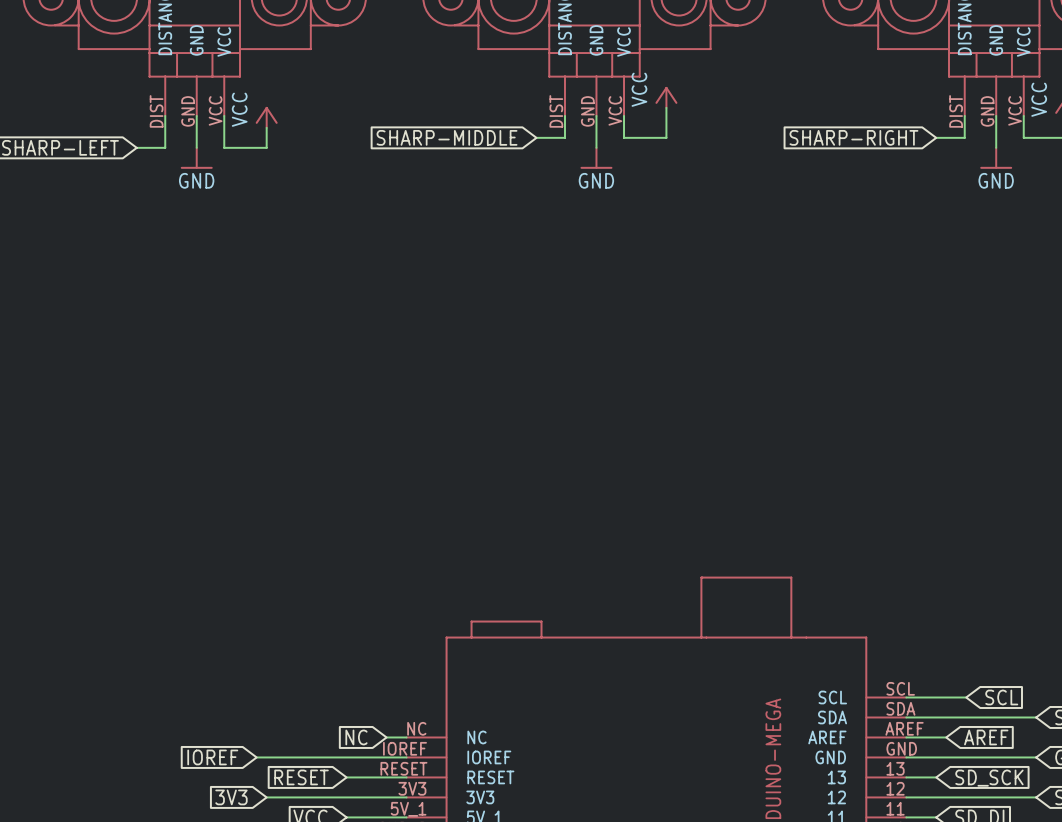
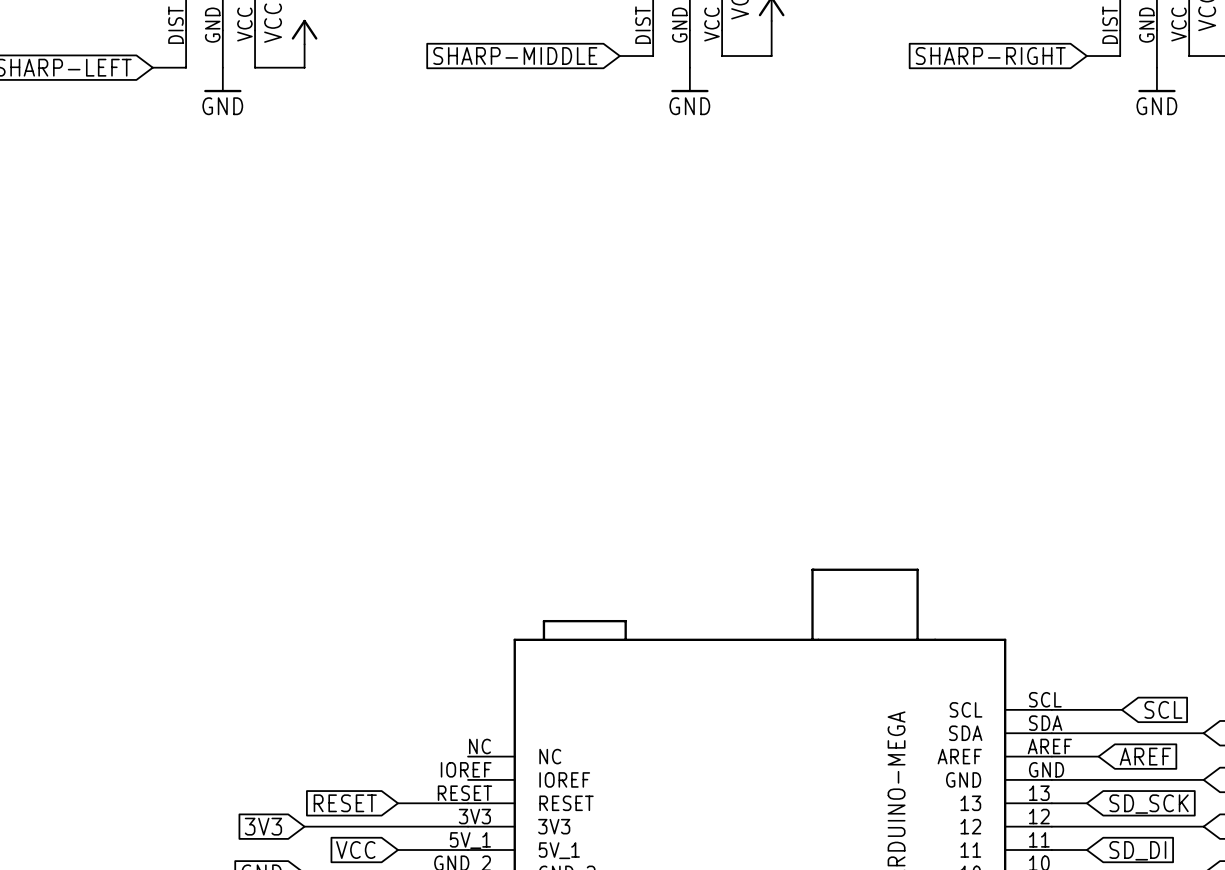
global label: NC (356, 737) -> none
wire: (386, 737) (406, 737) -> none
global label: IOREF (212, 757) -> none
wire: (256, 757) (406, 757) -> none

